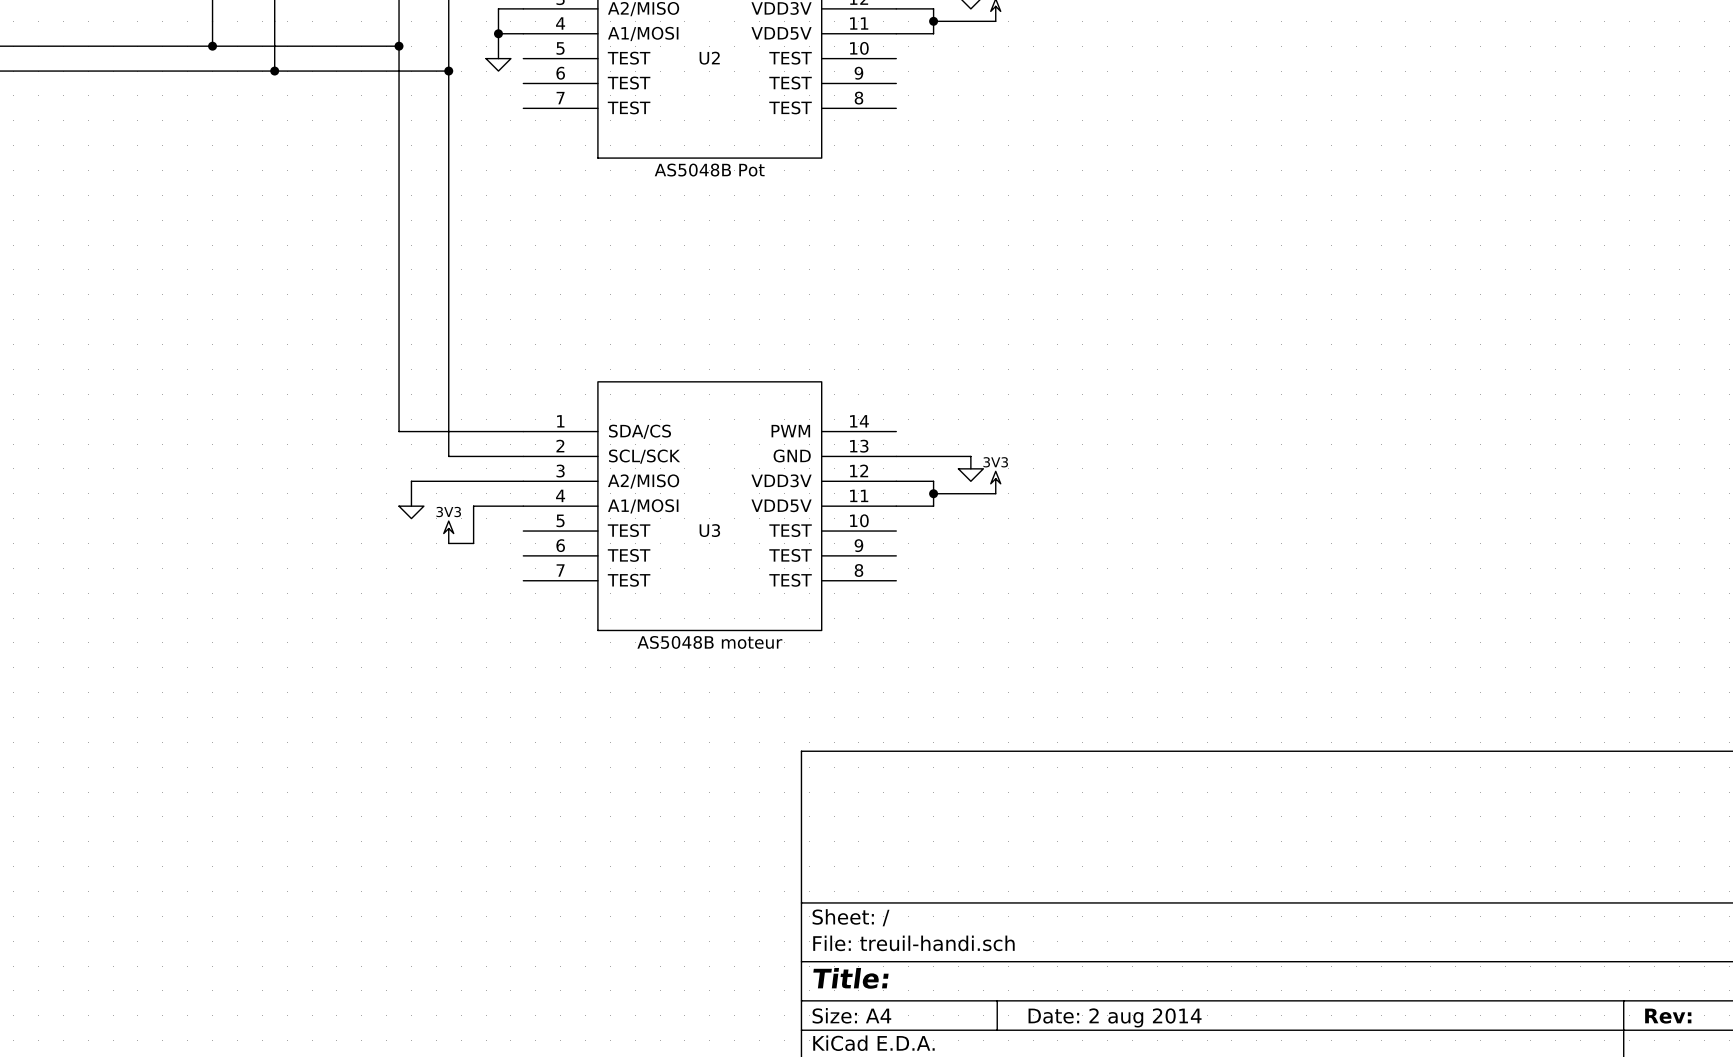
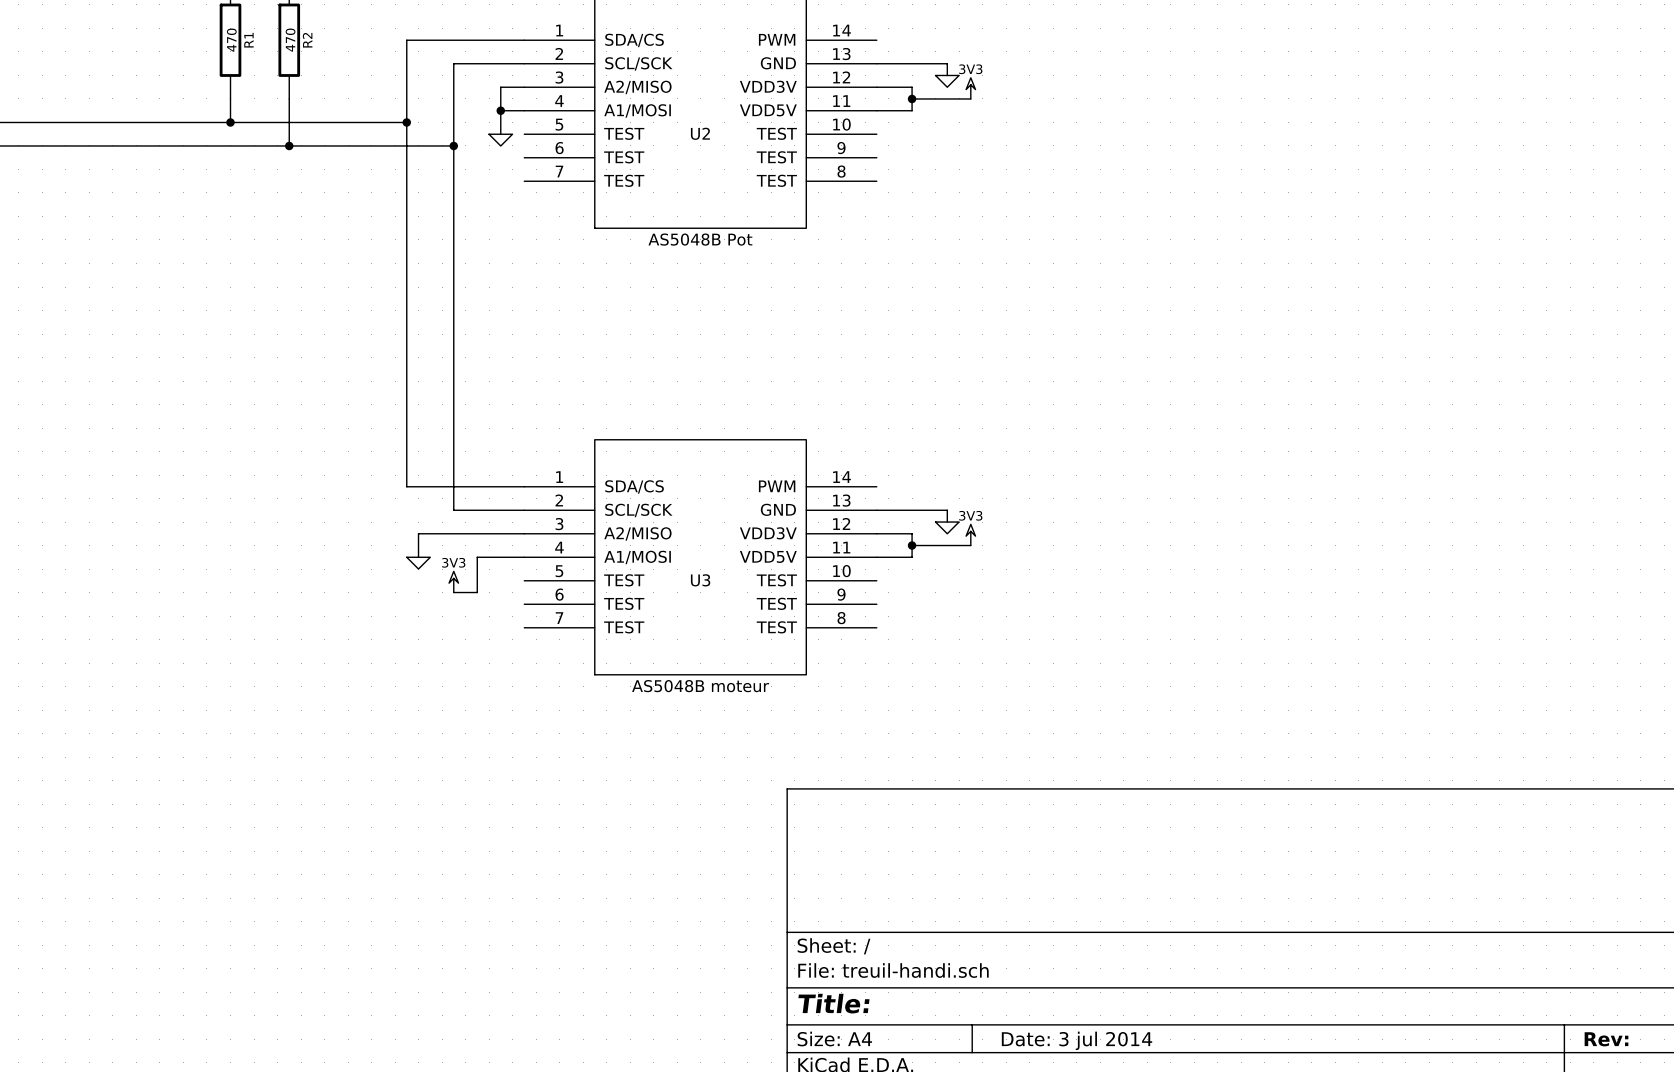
title block: Date: 2 aug 2014 (1115, 1017) -> Date: 3 jul 2014 (1077, 1040)

